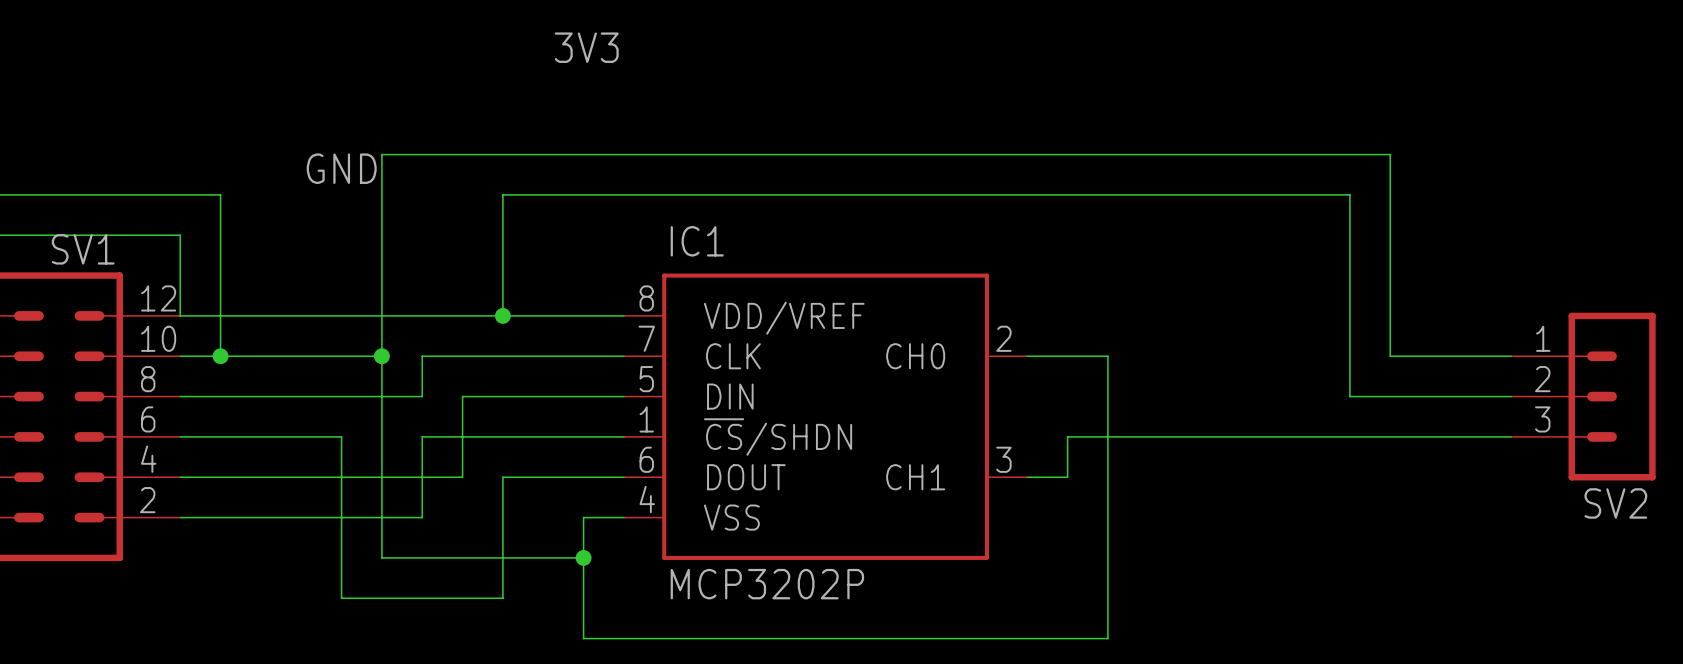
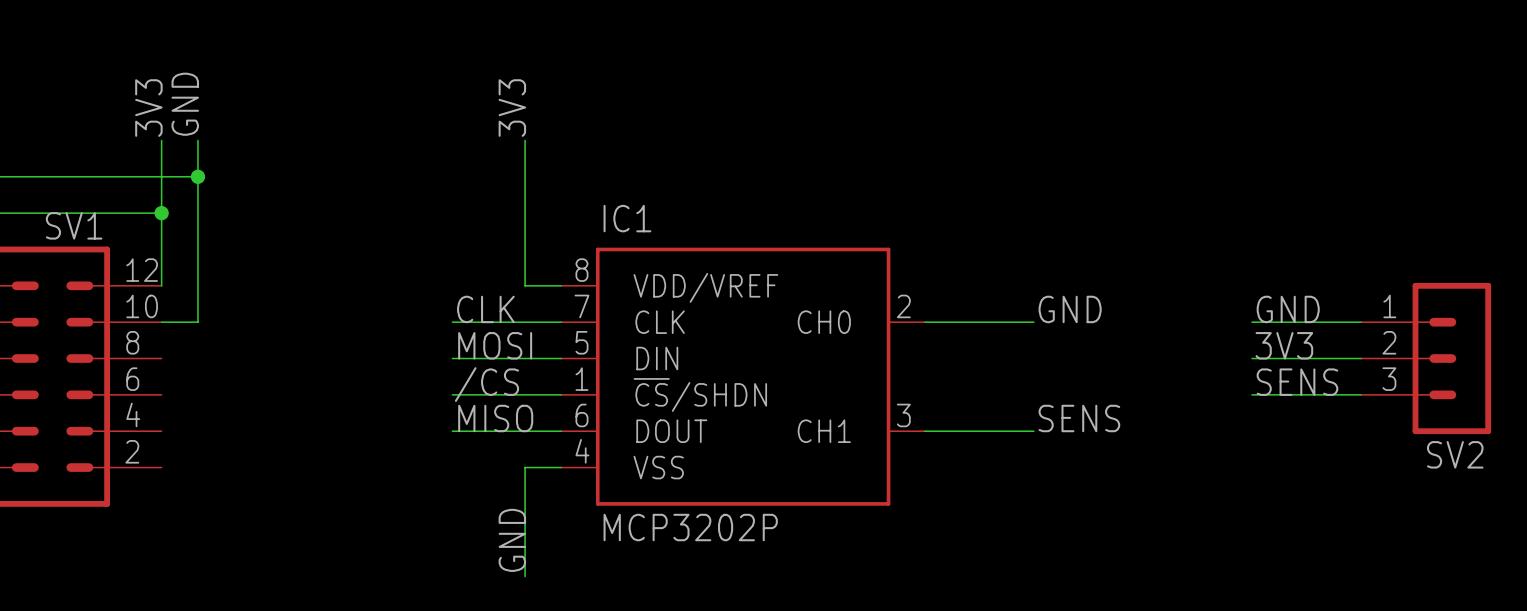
label rotation: 0° (586, 47) -> 90° counterclockwise (512, 108)
label: none -> 3V3 (148, 108)
wire: none -> (161, 140) (161, 213)
wire: none -> (197, 140) (197, 176)
label rotation: 0° (341, 168) -> 90° counterclockwise (185, 104)
label position: GND (341, 168) -> GND (185, 104)
junction: none -> (197, 176)
junction: none -> (161, 213)
wire: (180, 315) (583, 315) -> (525, 140) (525, 285)
wire: (502, 315) (502, 194) (1349, 194) (1349, 396) (1390, 396) -> none
junction: (502, 315) -> none
label: none -> CLK (485, 309)
label: none -> GND (1070, 309)
label: none -> GND (1288, 309)
wire: (220, 356) (381, 356) -> none
junction: (220, 356) -> none
junction: (381, 356) -> none
wire: (502, 356) (422, 356) (422, 396) (180, 396) -> none
wire: (1107, 356) (1107, 638) (583, 638) -> (997, 322) (1033, 322)
wire: (1390, 356) (1390, 154) (381, 154) (381, 557) (583, 557) -> none
label: none -> MOSI (495, 345)
label: none -> 3V3 (1284, 345)
wire: (502, 396) (462, 396) (462, 477) (180, 477) -> none
label: none -> SENS (1297, 382)
label: none -> /CS (486, 384)
wire: (180, 436) (341, 436) (341, 598) (502, 598) (502, 477) -> none
wire: (502, 436) (422, 436) (422, 517) (180, 517) -> none
wire: (1390, 436) (1067, 436) (1067, 477) -> (1033, 431) (961, 431)
label: none -> MISO (495, 418)
label: none -> SENS (1079, 418)
junction: (583, 557) -> none
label: none -> GND (512, 540)

